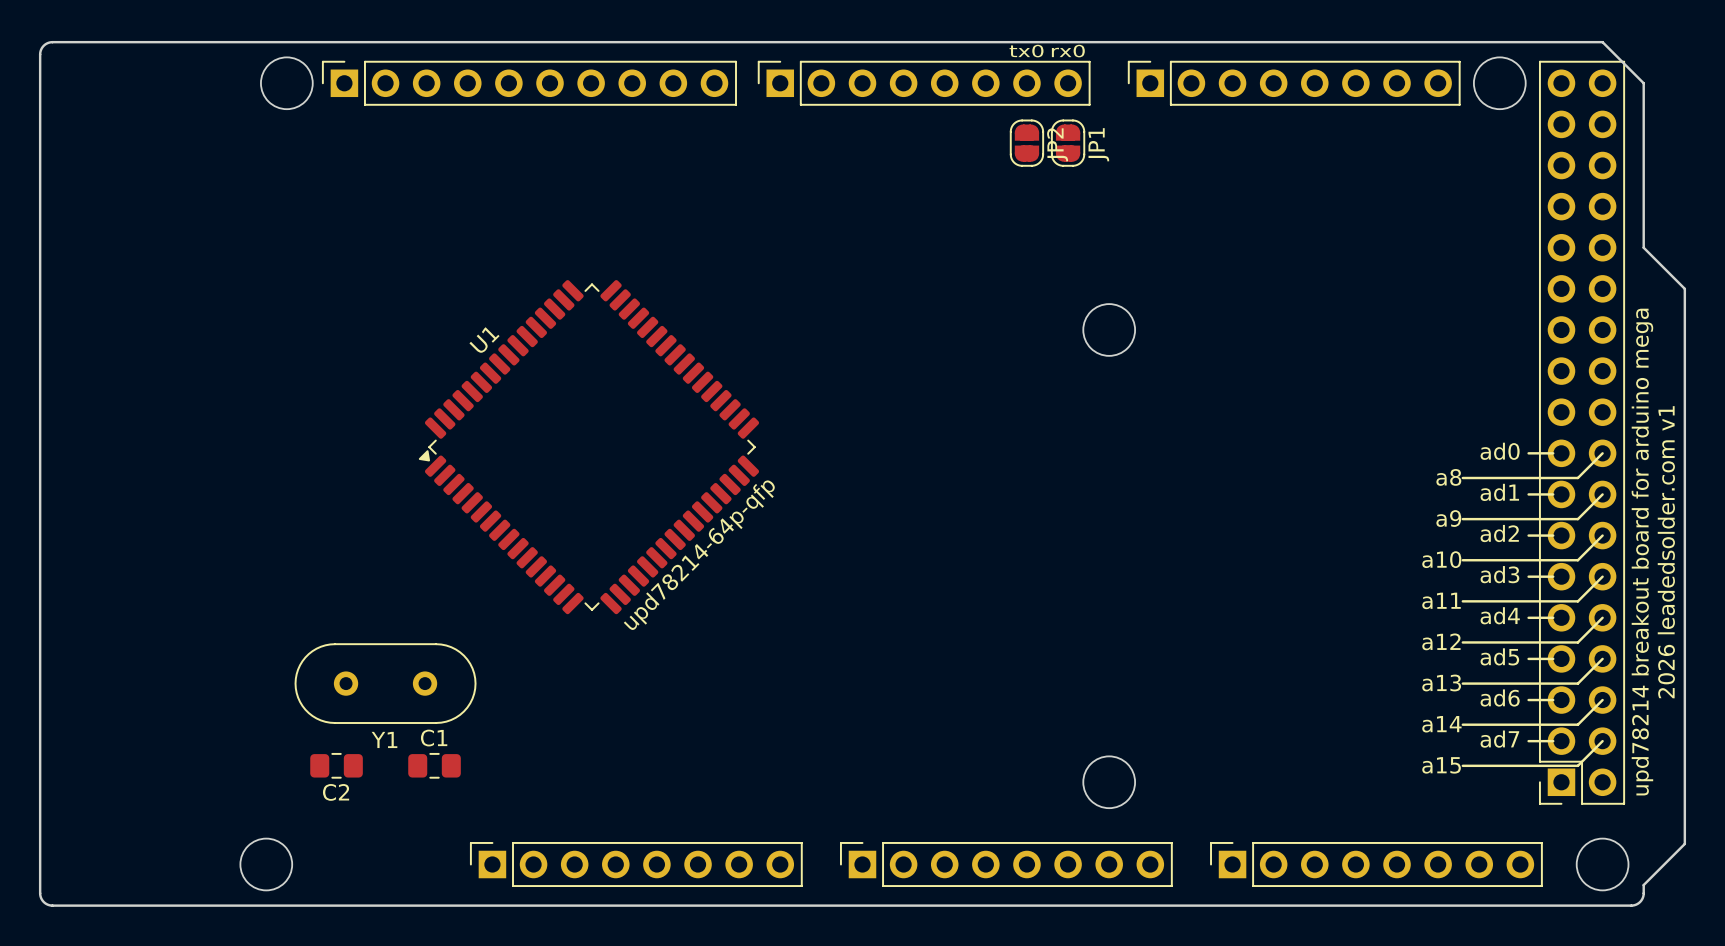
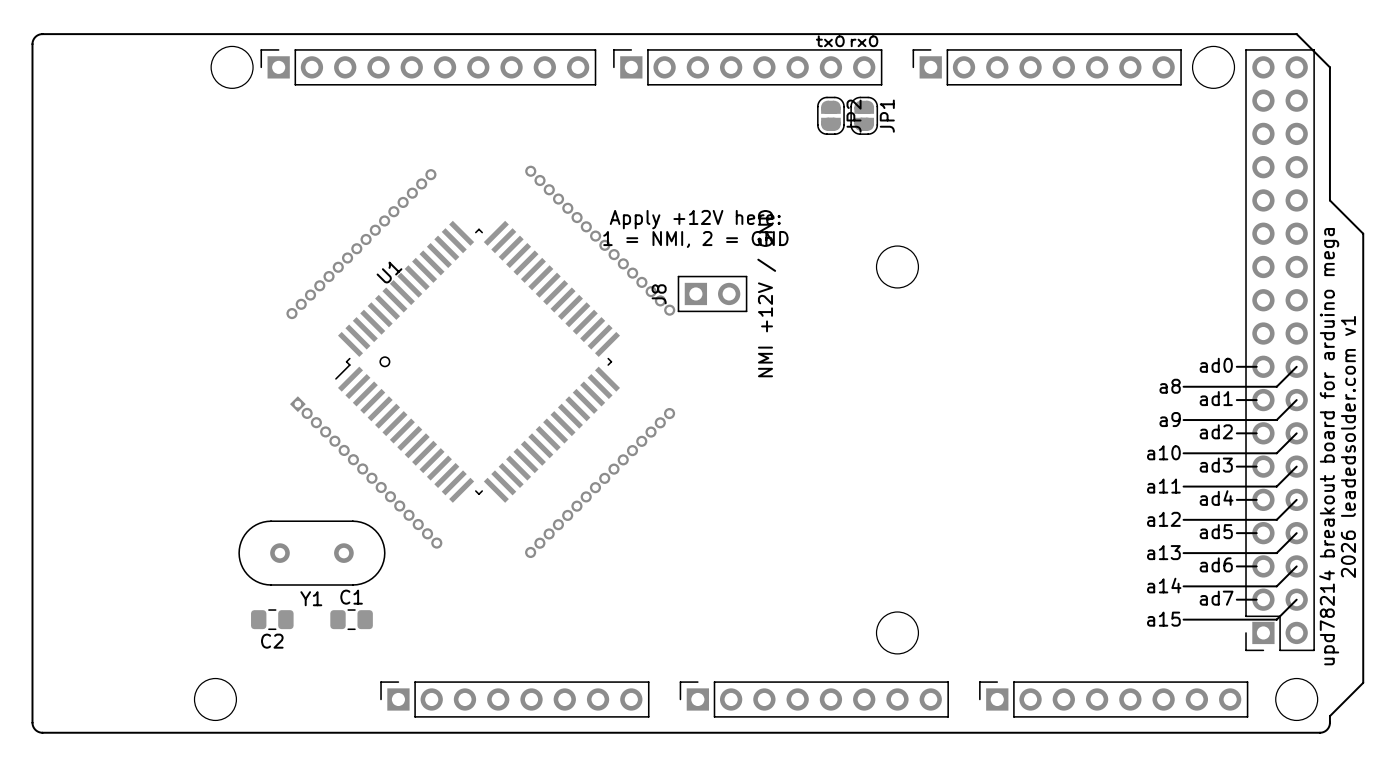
text: none -> Apply +12V here: (695, 219)
U1 footprint: [418, 280, 760, 615] -> [286, 165, 676, 559]
text: none -> 1 = NMI, 2 = GND (695, 239)
J8: none -> NMI +12V / GND (712, 293)
U1 value: upd78214-64p-qfp (699, 555) -> none

